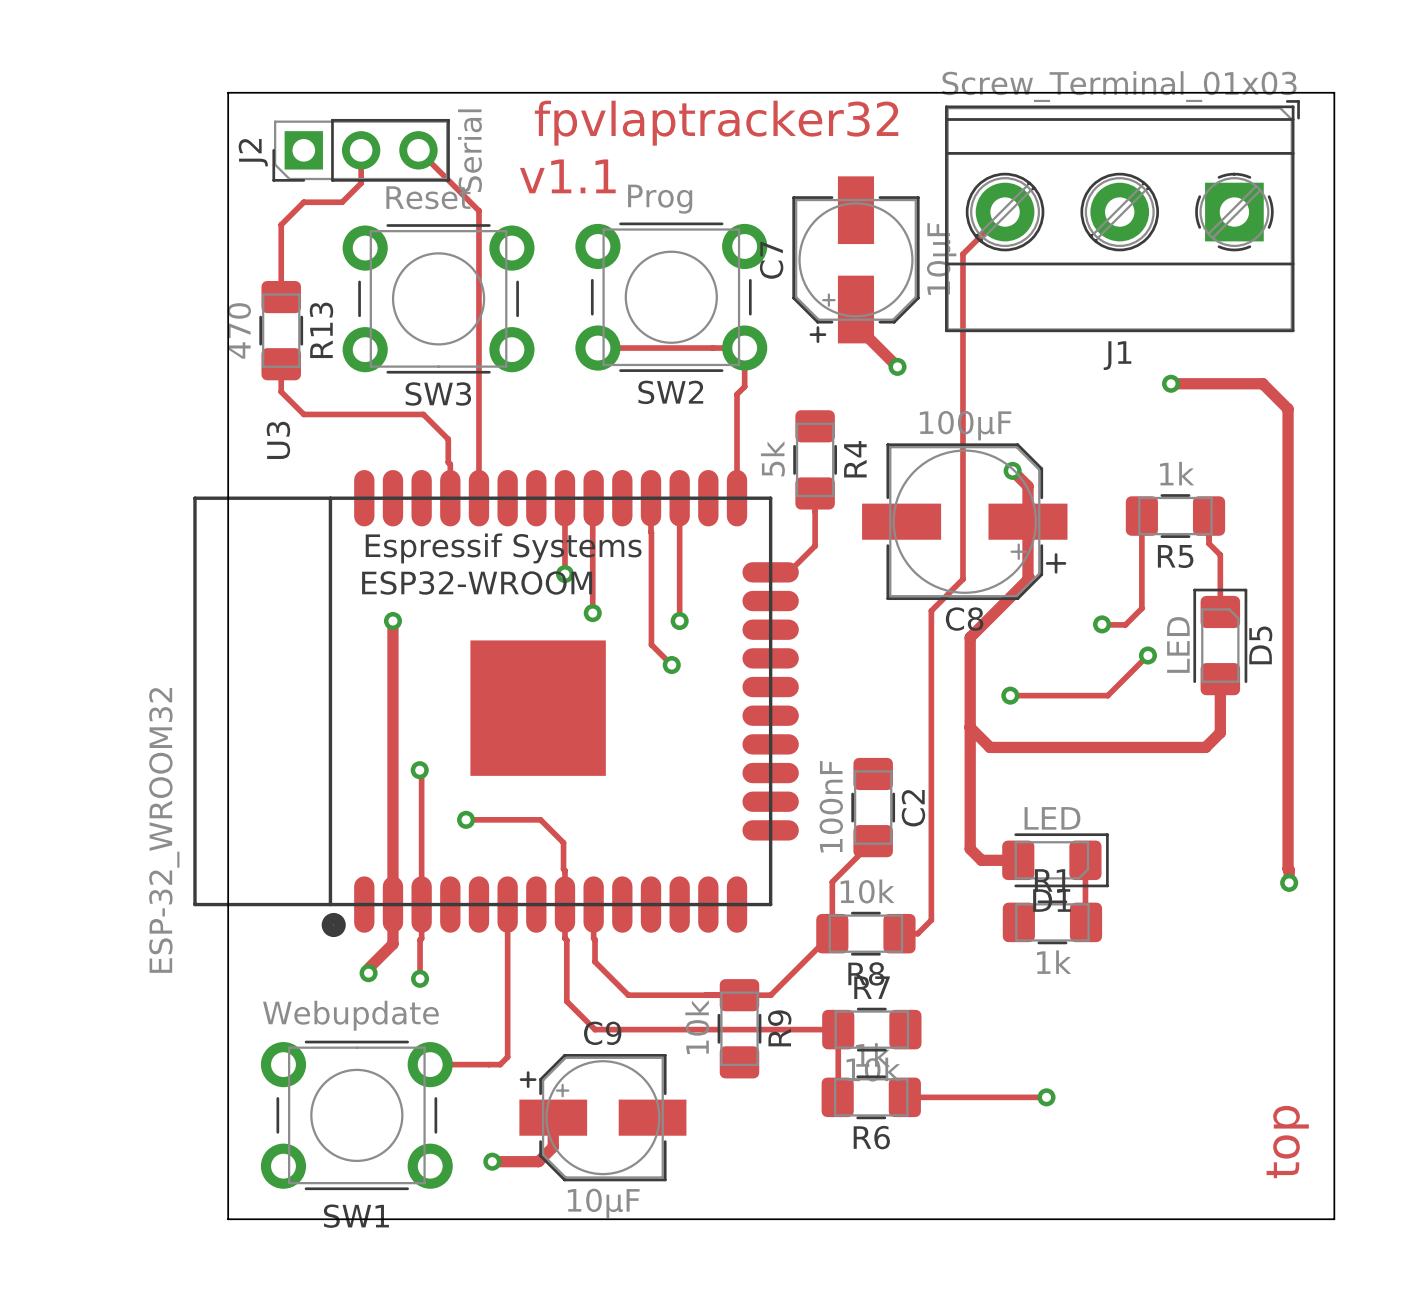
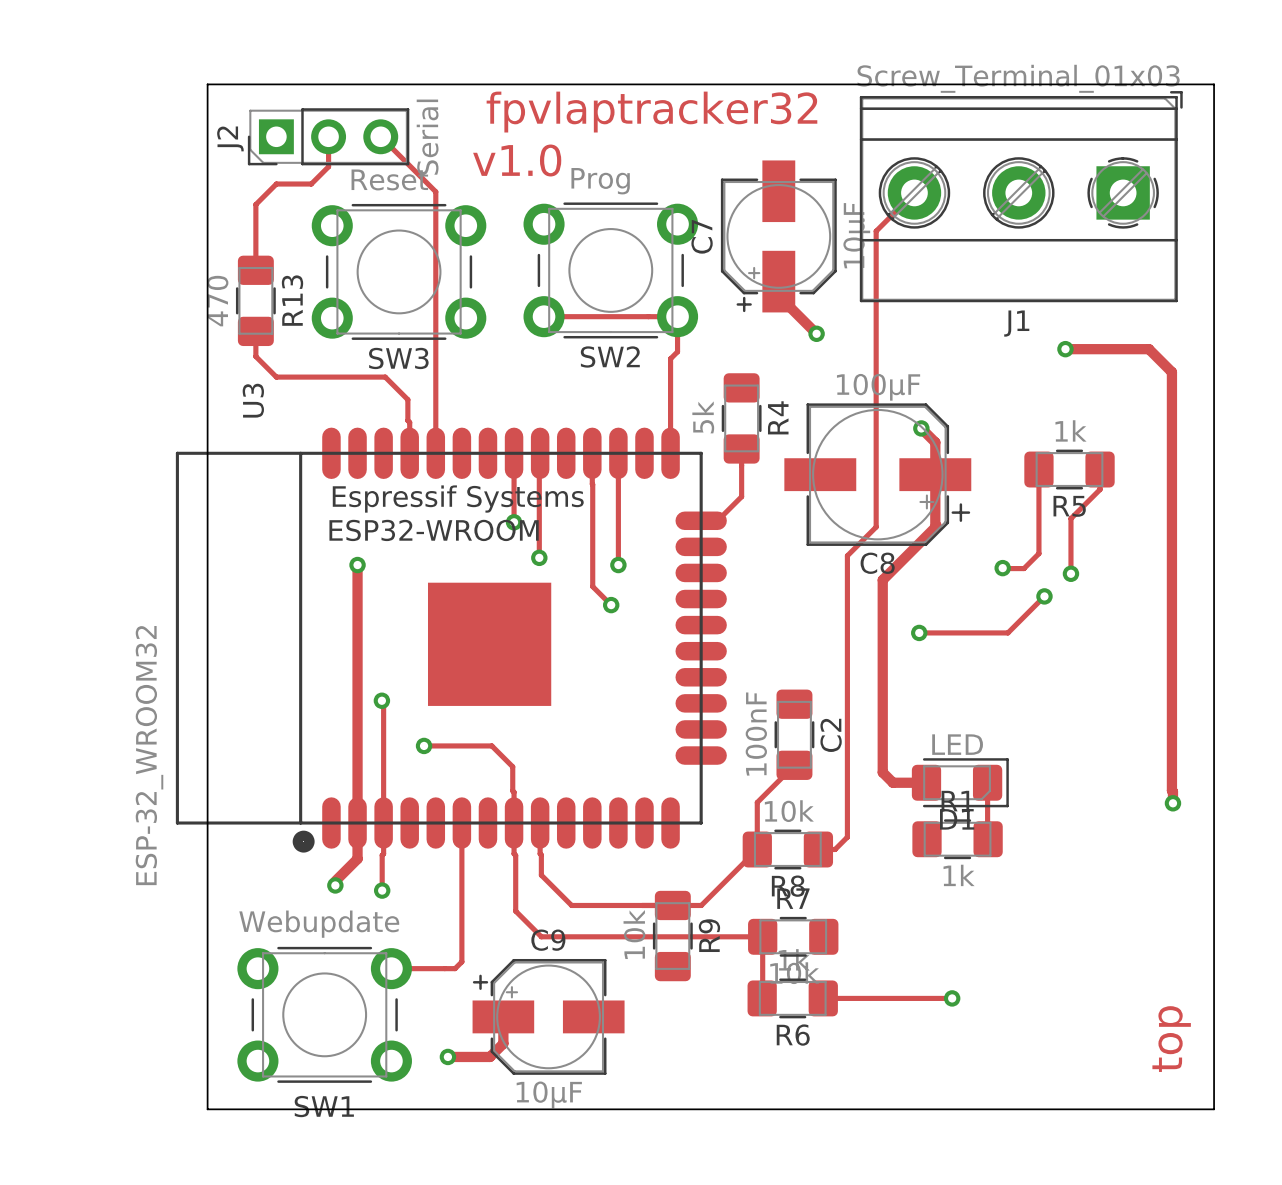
text: v1.1 (567, 176) -> v1.0 (517, 160)
track: (1209, 538) (1209, 543) (1220, 554) (1220, 611) -> (1100, 489) (1070, 518) (1070, 573)
via: none -> (1070, 573)
D5: LED (1220, 641) -> none
track: (1220, 679) (1220, 732) (1205, 747) (990, 747) (970, 727) -> none

